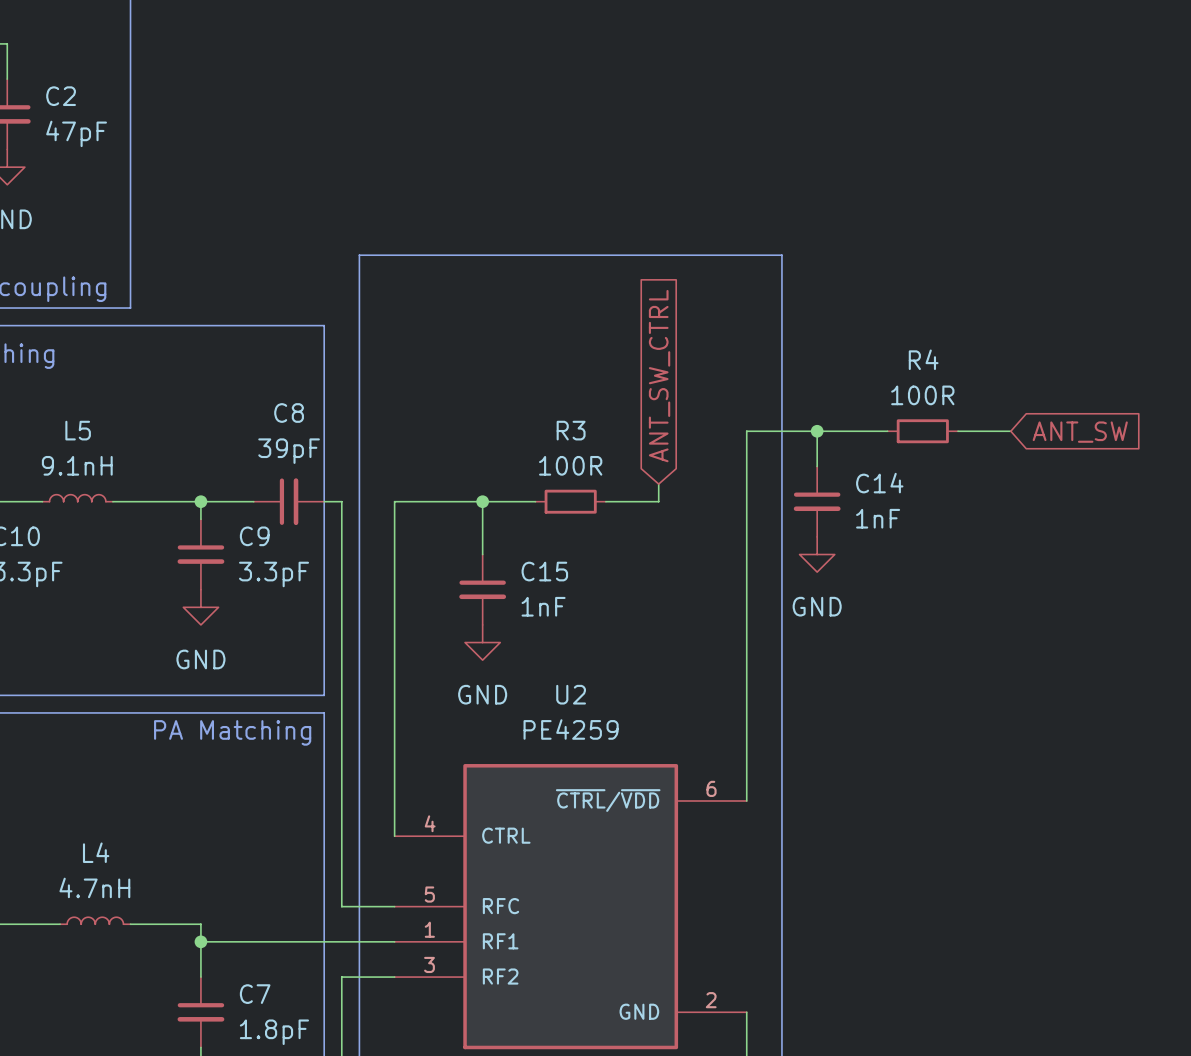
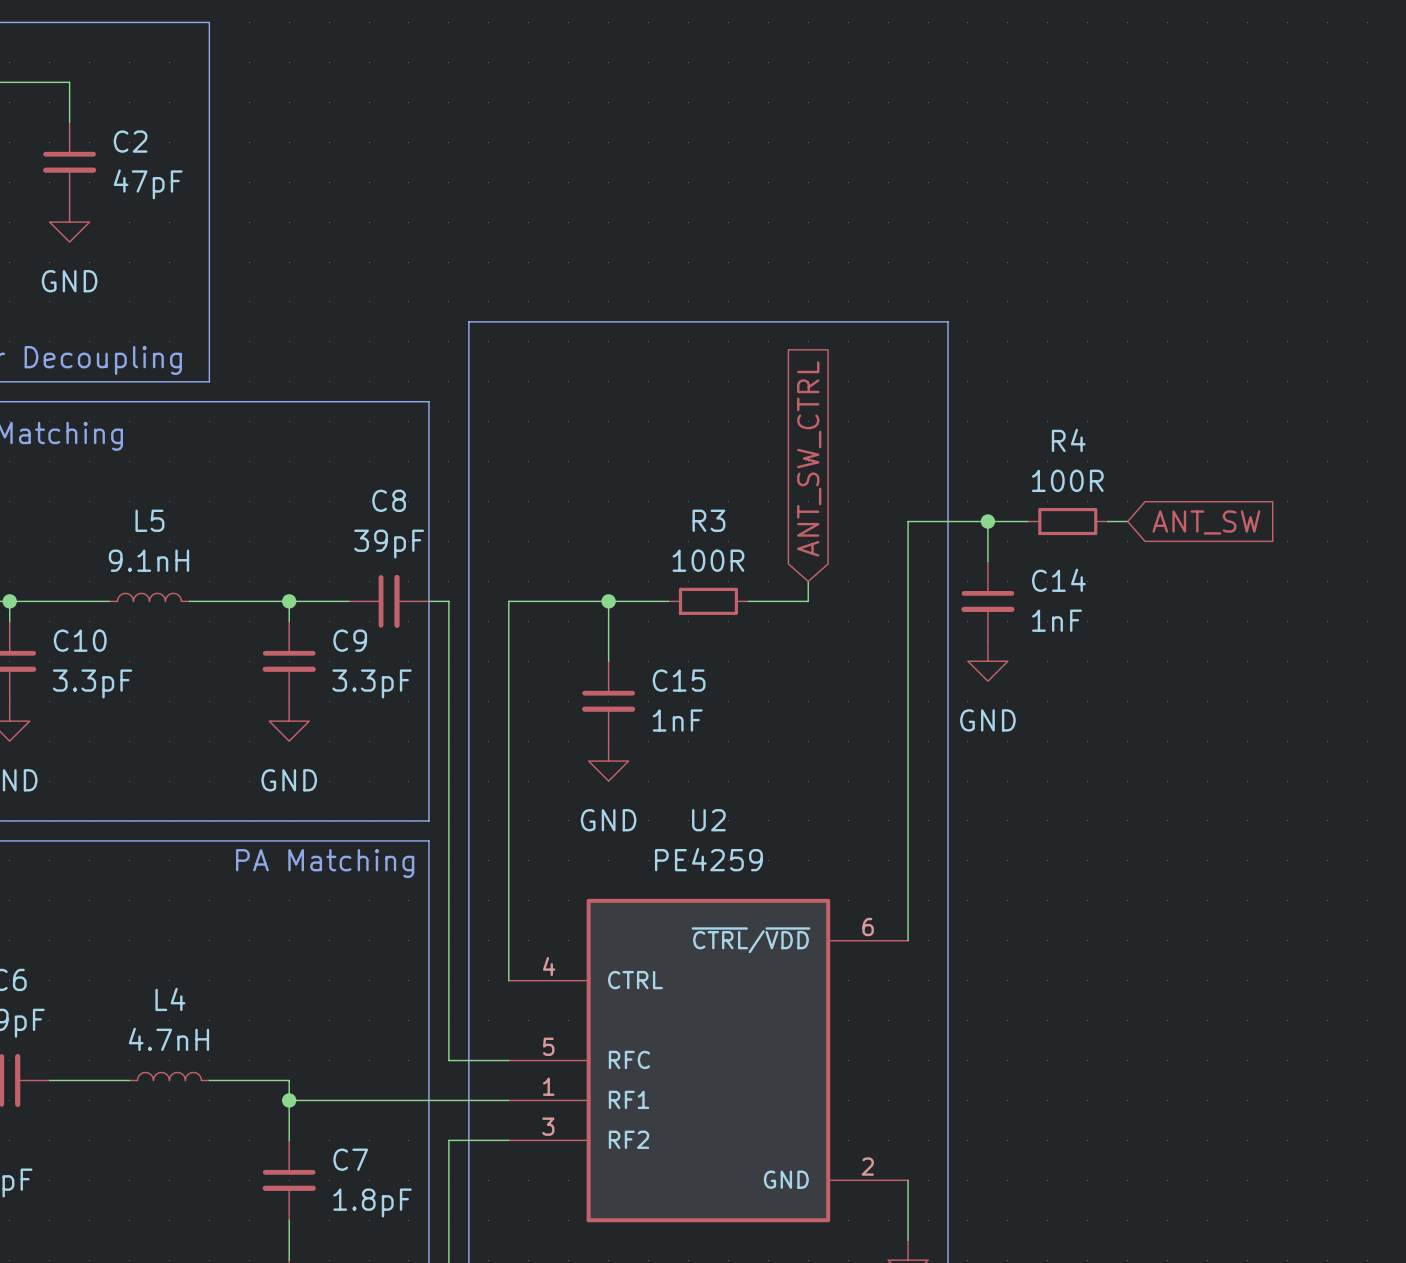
wire: (852, 431) (887, 431) -> none
wire: none -> (1107, 521) (1127, 521)
R4 position: (922, 431) -> (1067, 521)
wire: (958, 431) (1010, 431) -> none
global label position: ANT_SW (1080, 432) -> ANT_SW (1206, 522)

